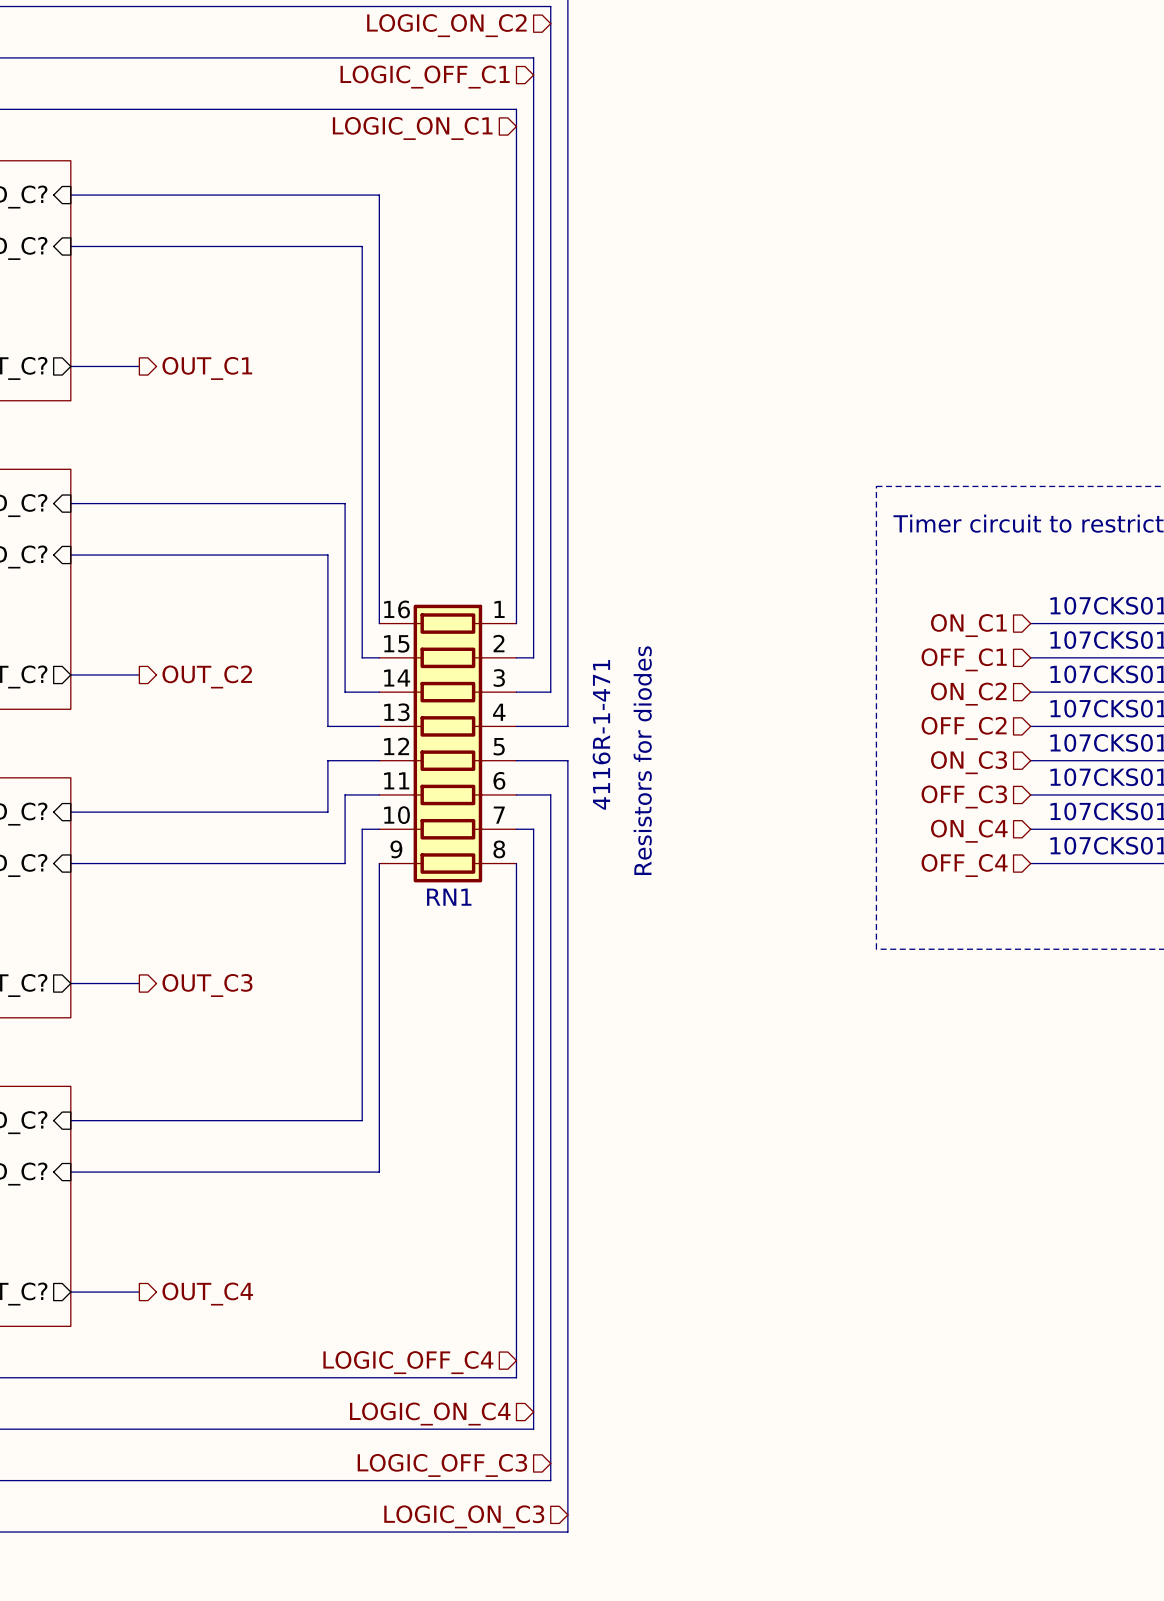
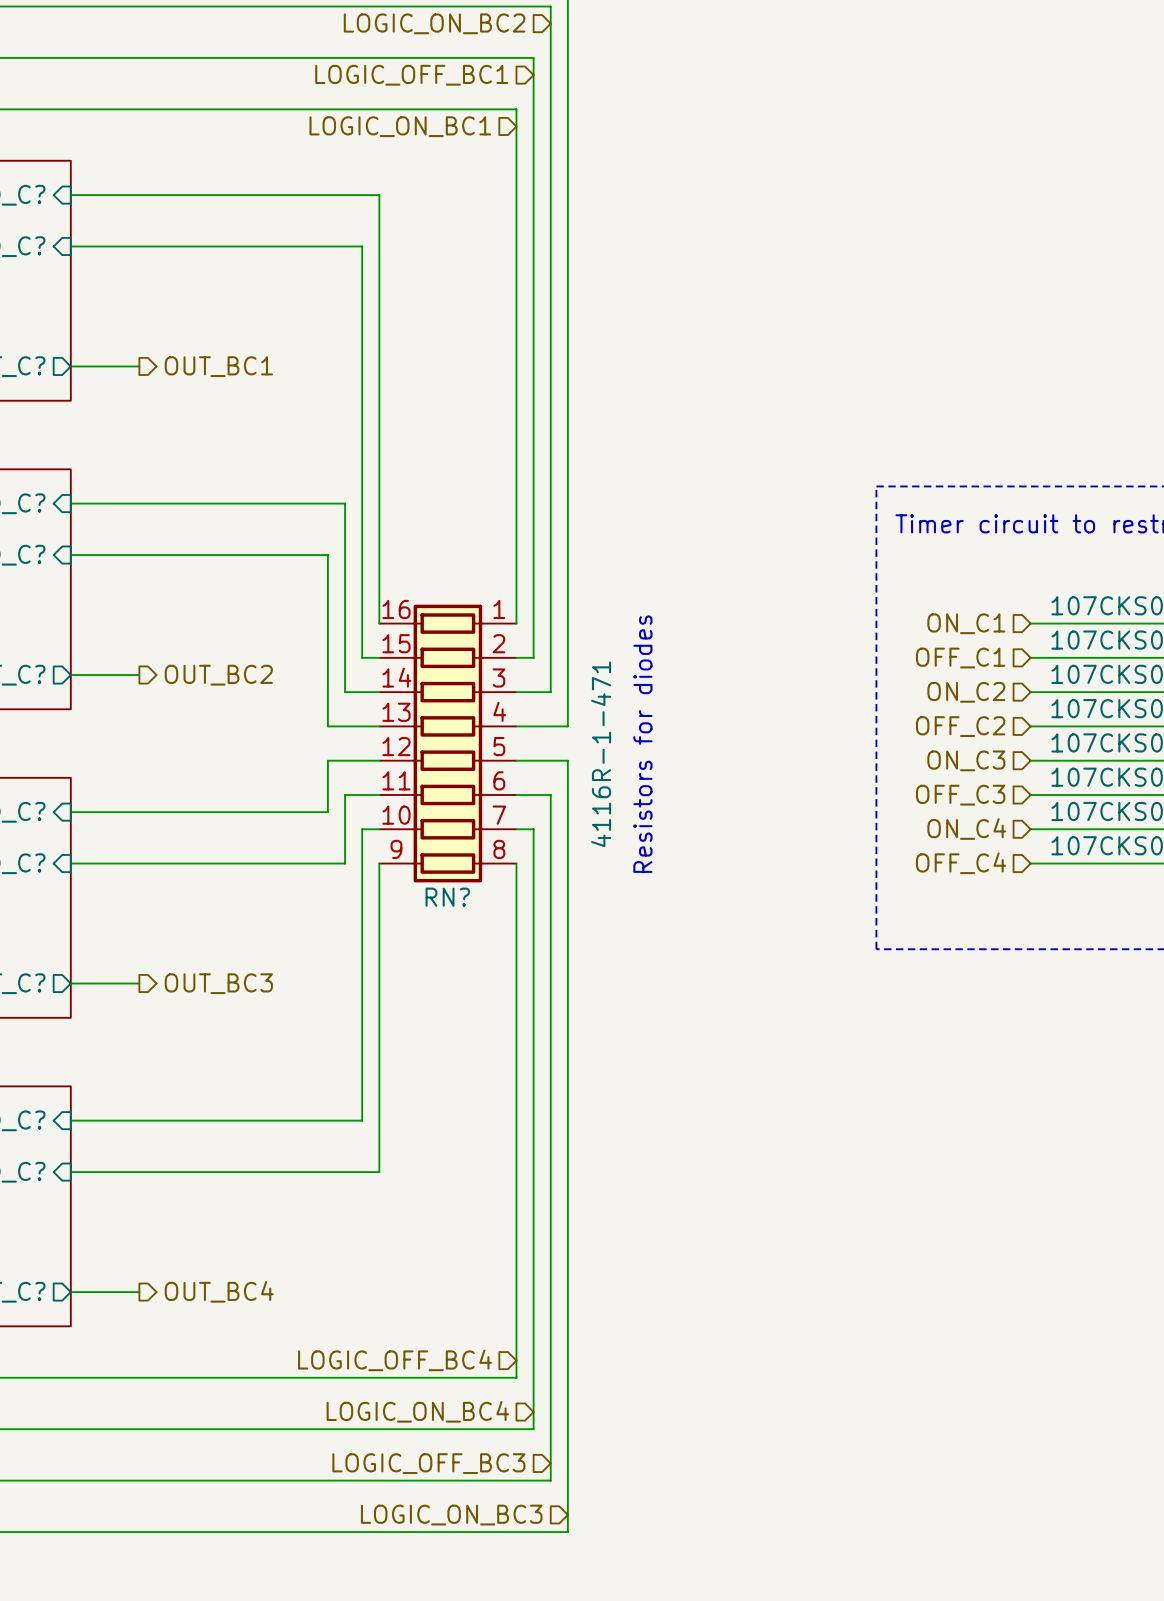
hierarchical label: LOGIC_ON_C2 (446, 25) -> LOGIC_ON_BC2 (434, 23)
hierarchical label: LOGIC_OFF_C1 (425, 77) -> LOGIC_OFF_BC1 (411, 75)
hierarchical label: LOGIC_ON_C1 (412, 128) -> LOGIC_ON_BC1 (400, 126)
hierarchical label: OUT_C1 (207, 368) -> OUT_BC1 (218, 366)
hierarchical label: OUT_C2 (207, 676) -> OUT_BC2 (218, 675)
RN1 name: RN1 (449, 897) -> RN? (447, 897)
hierarchical label: OUT_C3 (207, 985) -> OUT_BC3 (218, 983)
hierarchical label: OUT_C4 (207, 1294) -> OUT_BC4 (219, 1291)
hierarchical label: LOGIC_OFF_C4 (408, 1362) -> LOGIC_OFF_BC4 (394, 1360)
hierarchical label: LOGIC_ON_C4 (430, 1414) -> LOGIC_ON_BC4 (417, 1411)
hierarchical label: LOGIC_OFF_C3 (442, 1465) -> LOGIC_OFF_BC3 (428, 1463)
hierarchical label: LOGIC_ON_C3 (464, 1516) -> LOGIC_ON_BC3 (451, 1515)

